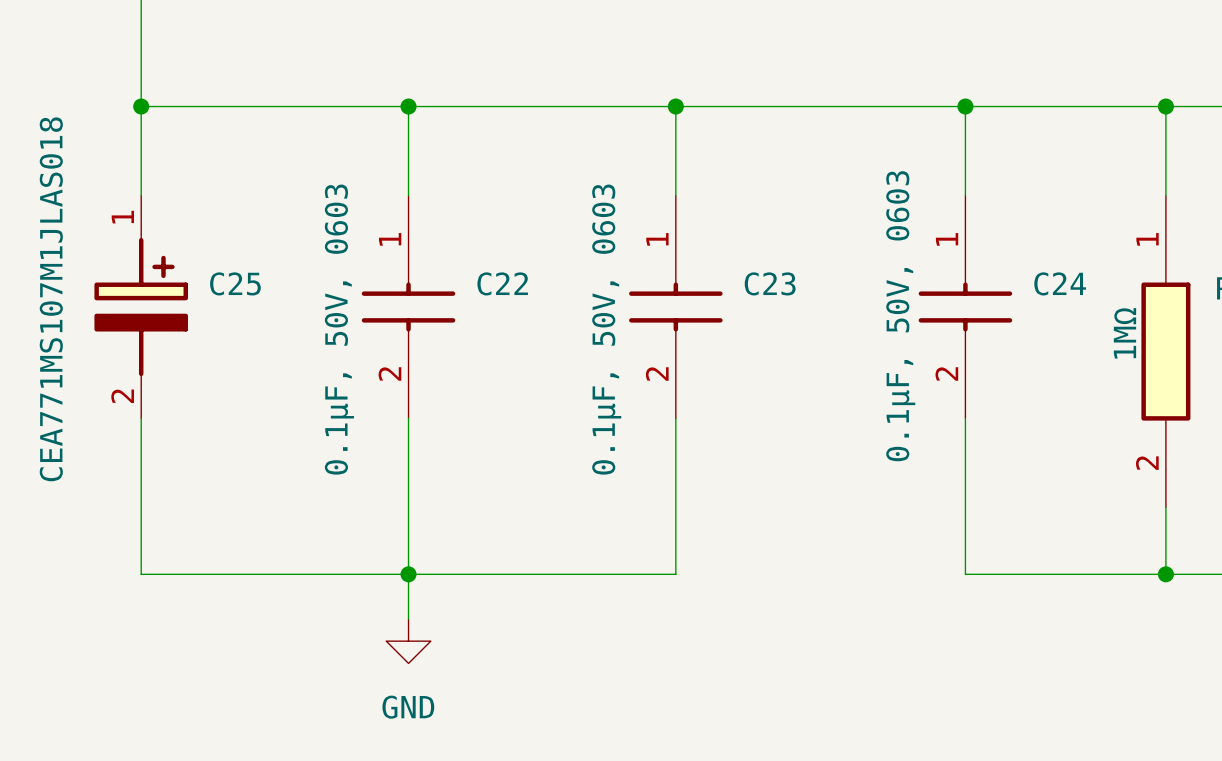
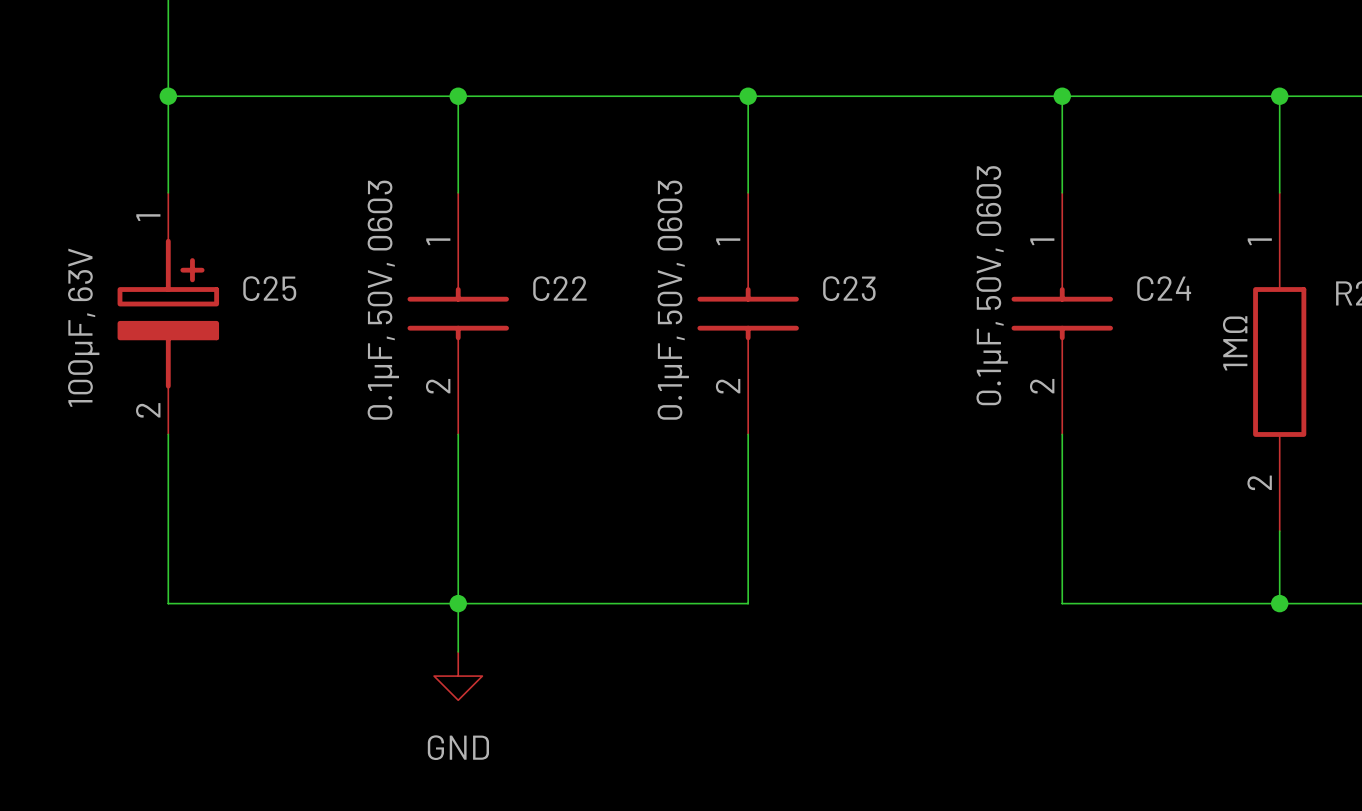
C25 value: CEA771MS107M1JLAS018 (51, 299) -> none
C25 text: none -> 100µF, 63V (83, 327)

